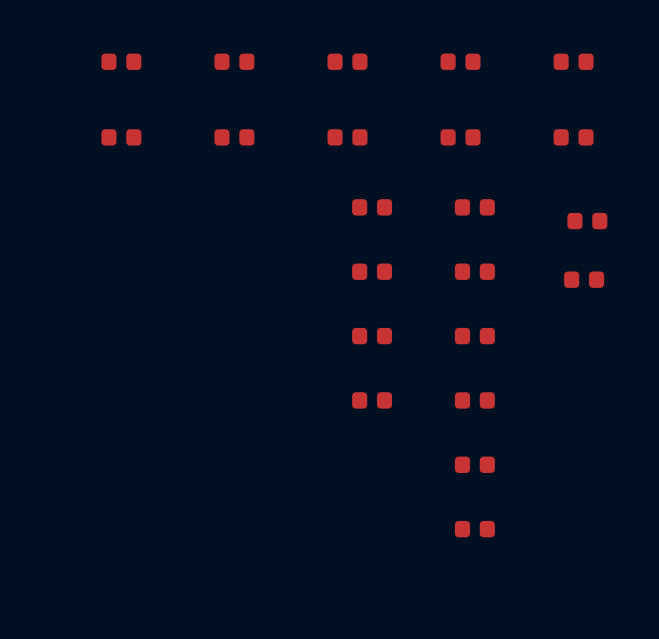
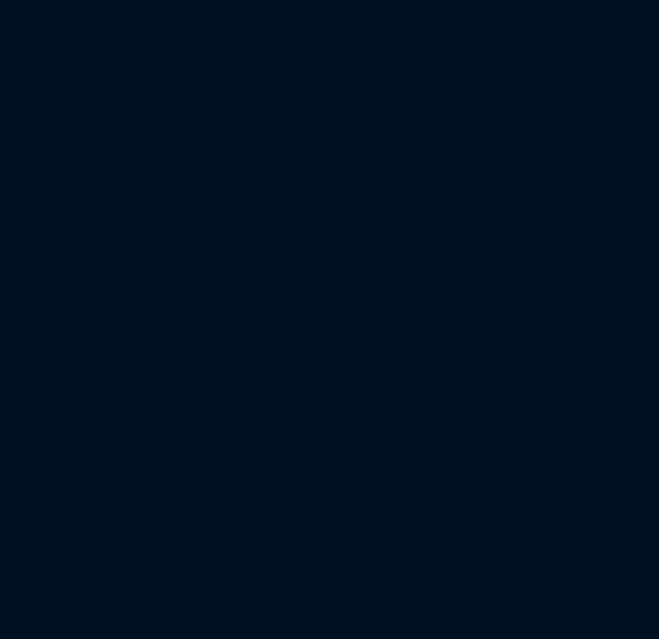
part: (121, 61) -> none
part: (234, 61) -> none
part: (347, 61) -> none
part: (460, 61) -> none
part: (573, 61) -> none
part: (121, 137) -> none
part: (234, 137) -> none
part: (347, 137) -> none
part: (460, 137) -> none
part: (573, 137) -> none
part: (372, 207) -> none
part: (474, 207) -> none
part: (587, 221) -> none
part: (372, 271) -> none
part: (474, 271) -> none
part: (584, 279) -> none
part: (372, 336) -> none
part: (474, 336) -> none
part: (372, 400) -> none
part: (474, 400) -> none
part: (474, 464) -> none
part: (474, 529) -> none

